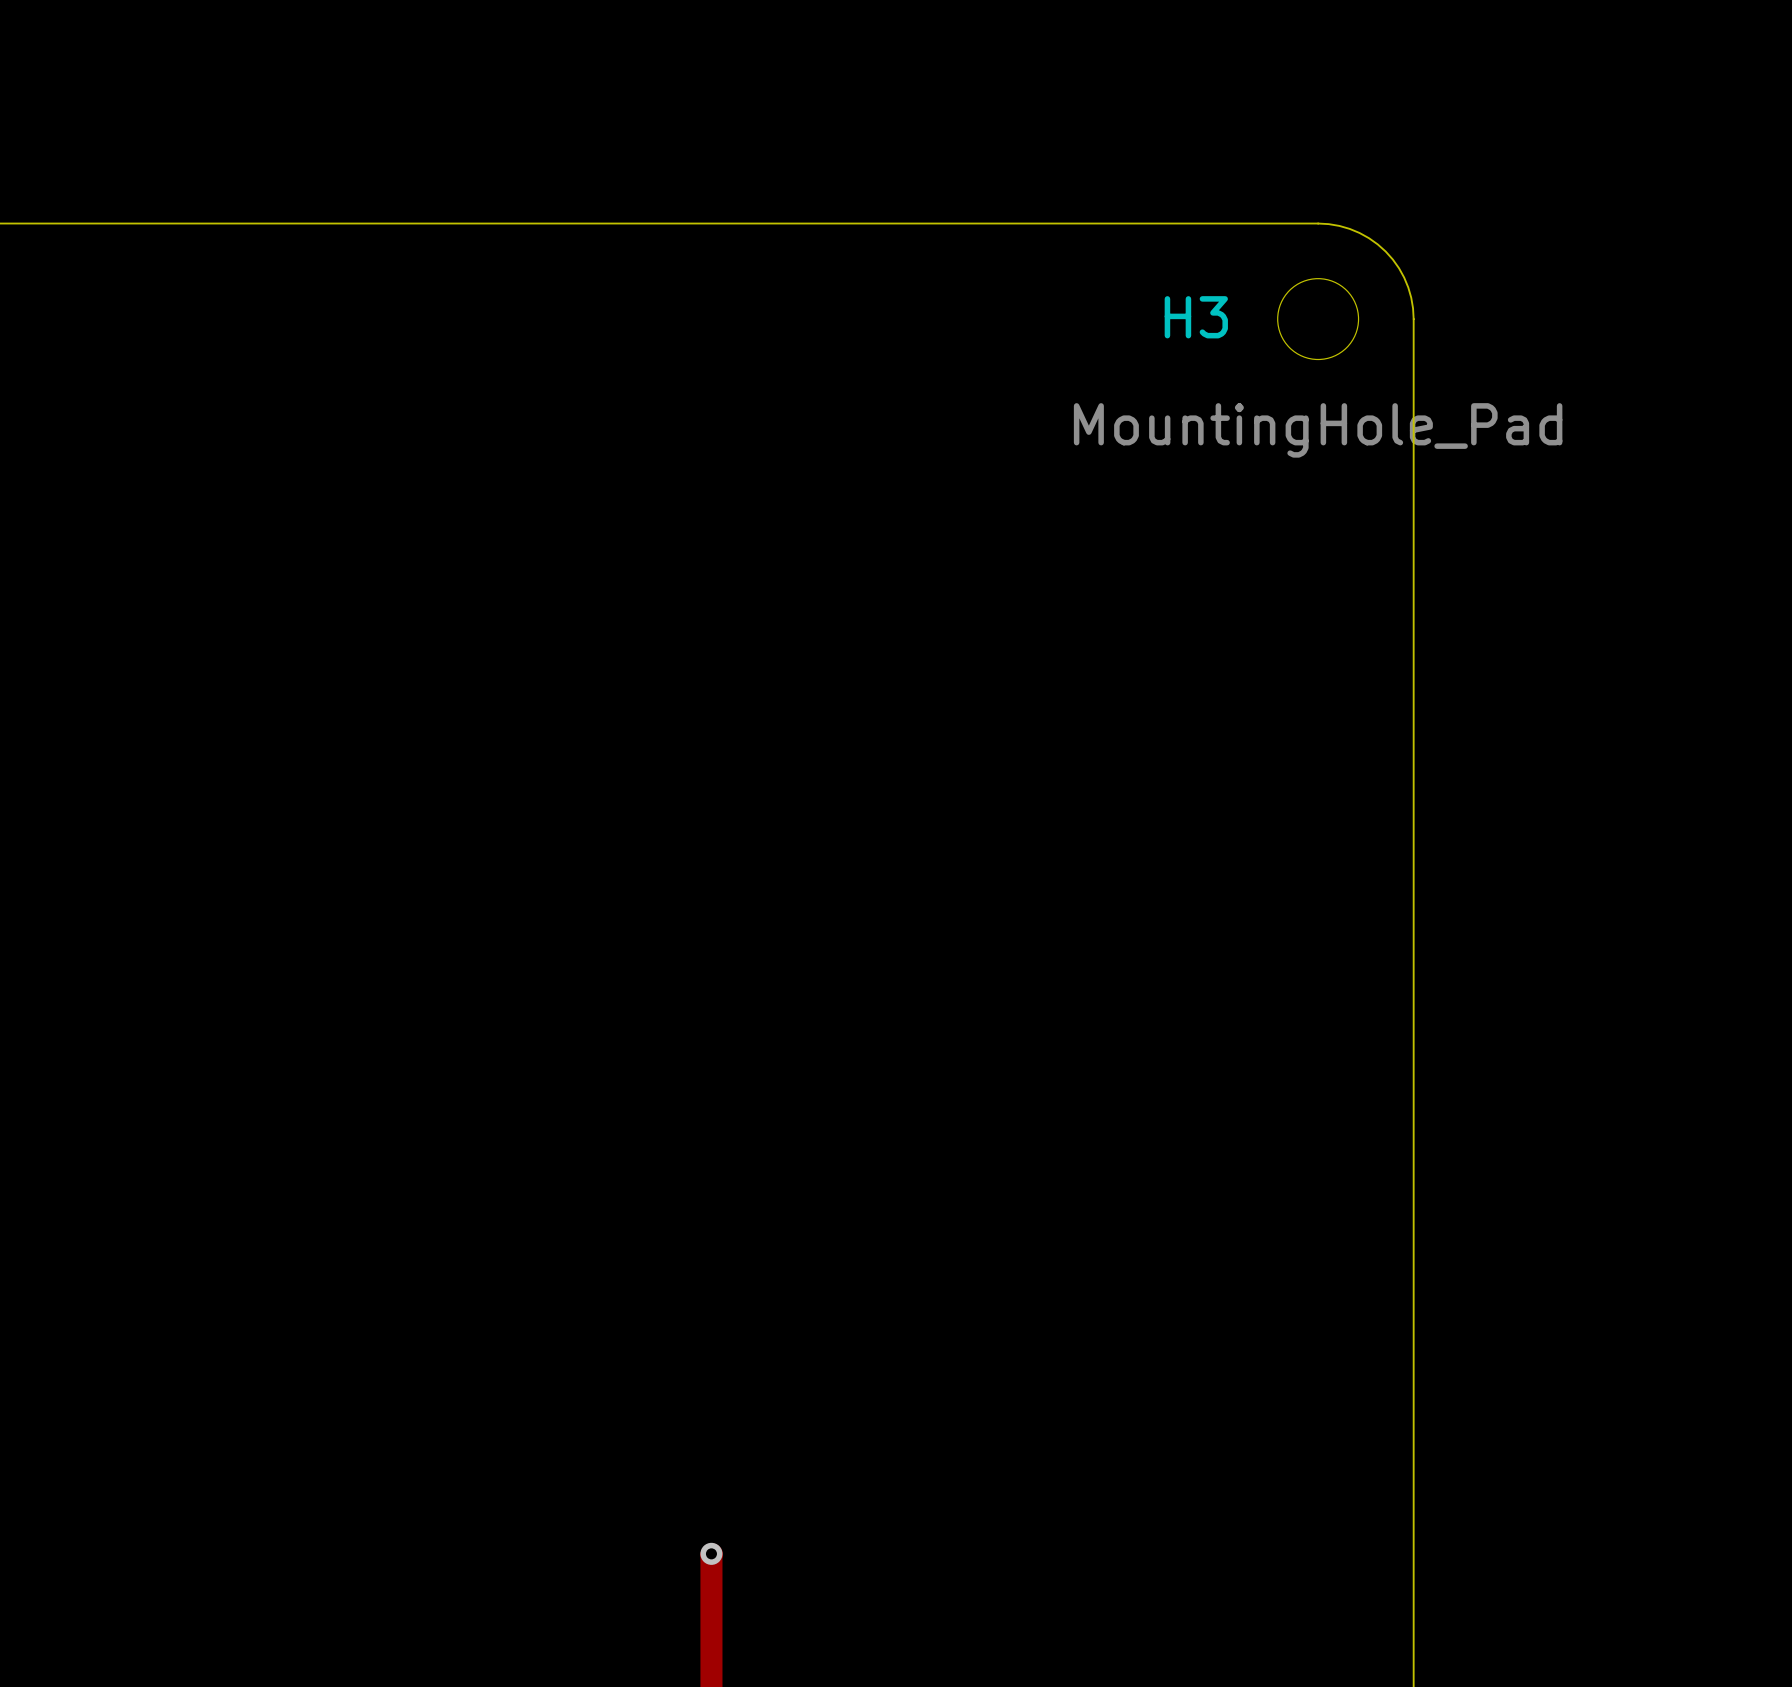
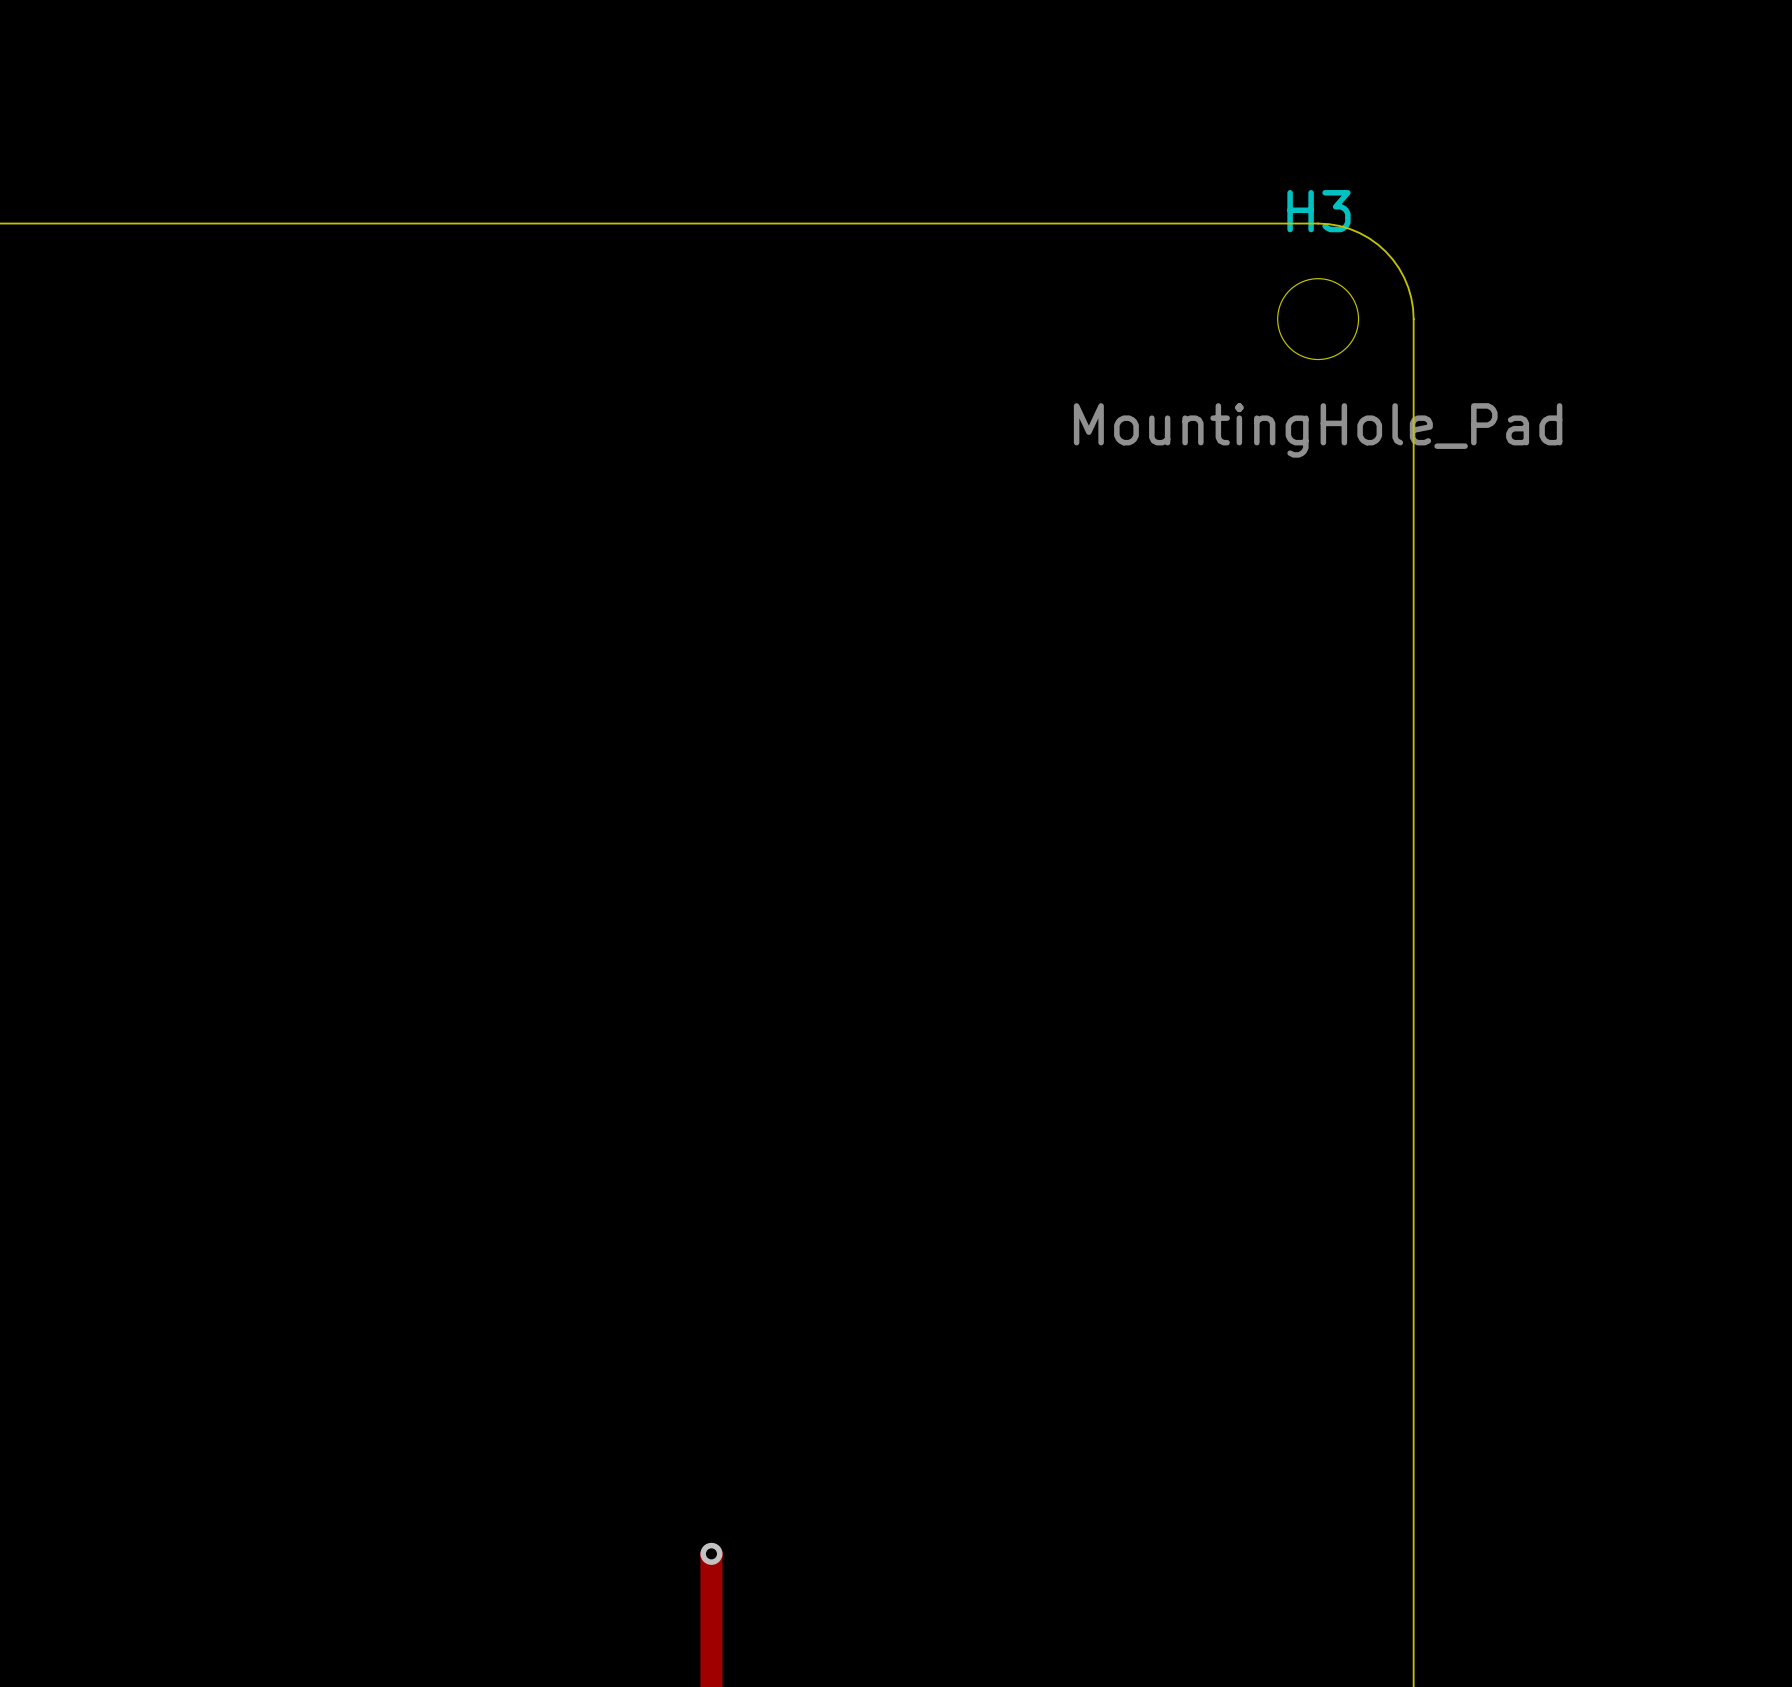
H3 name position: H3 (1196, 317) -> H3 (1318, 211)

